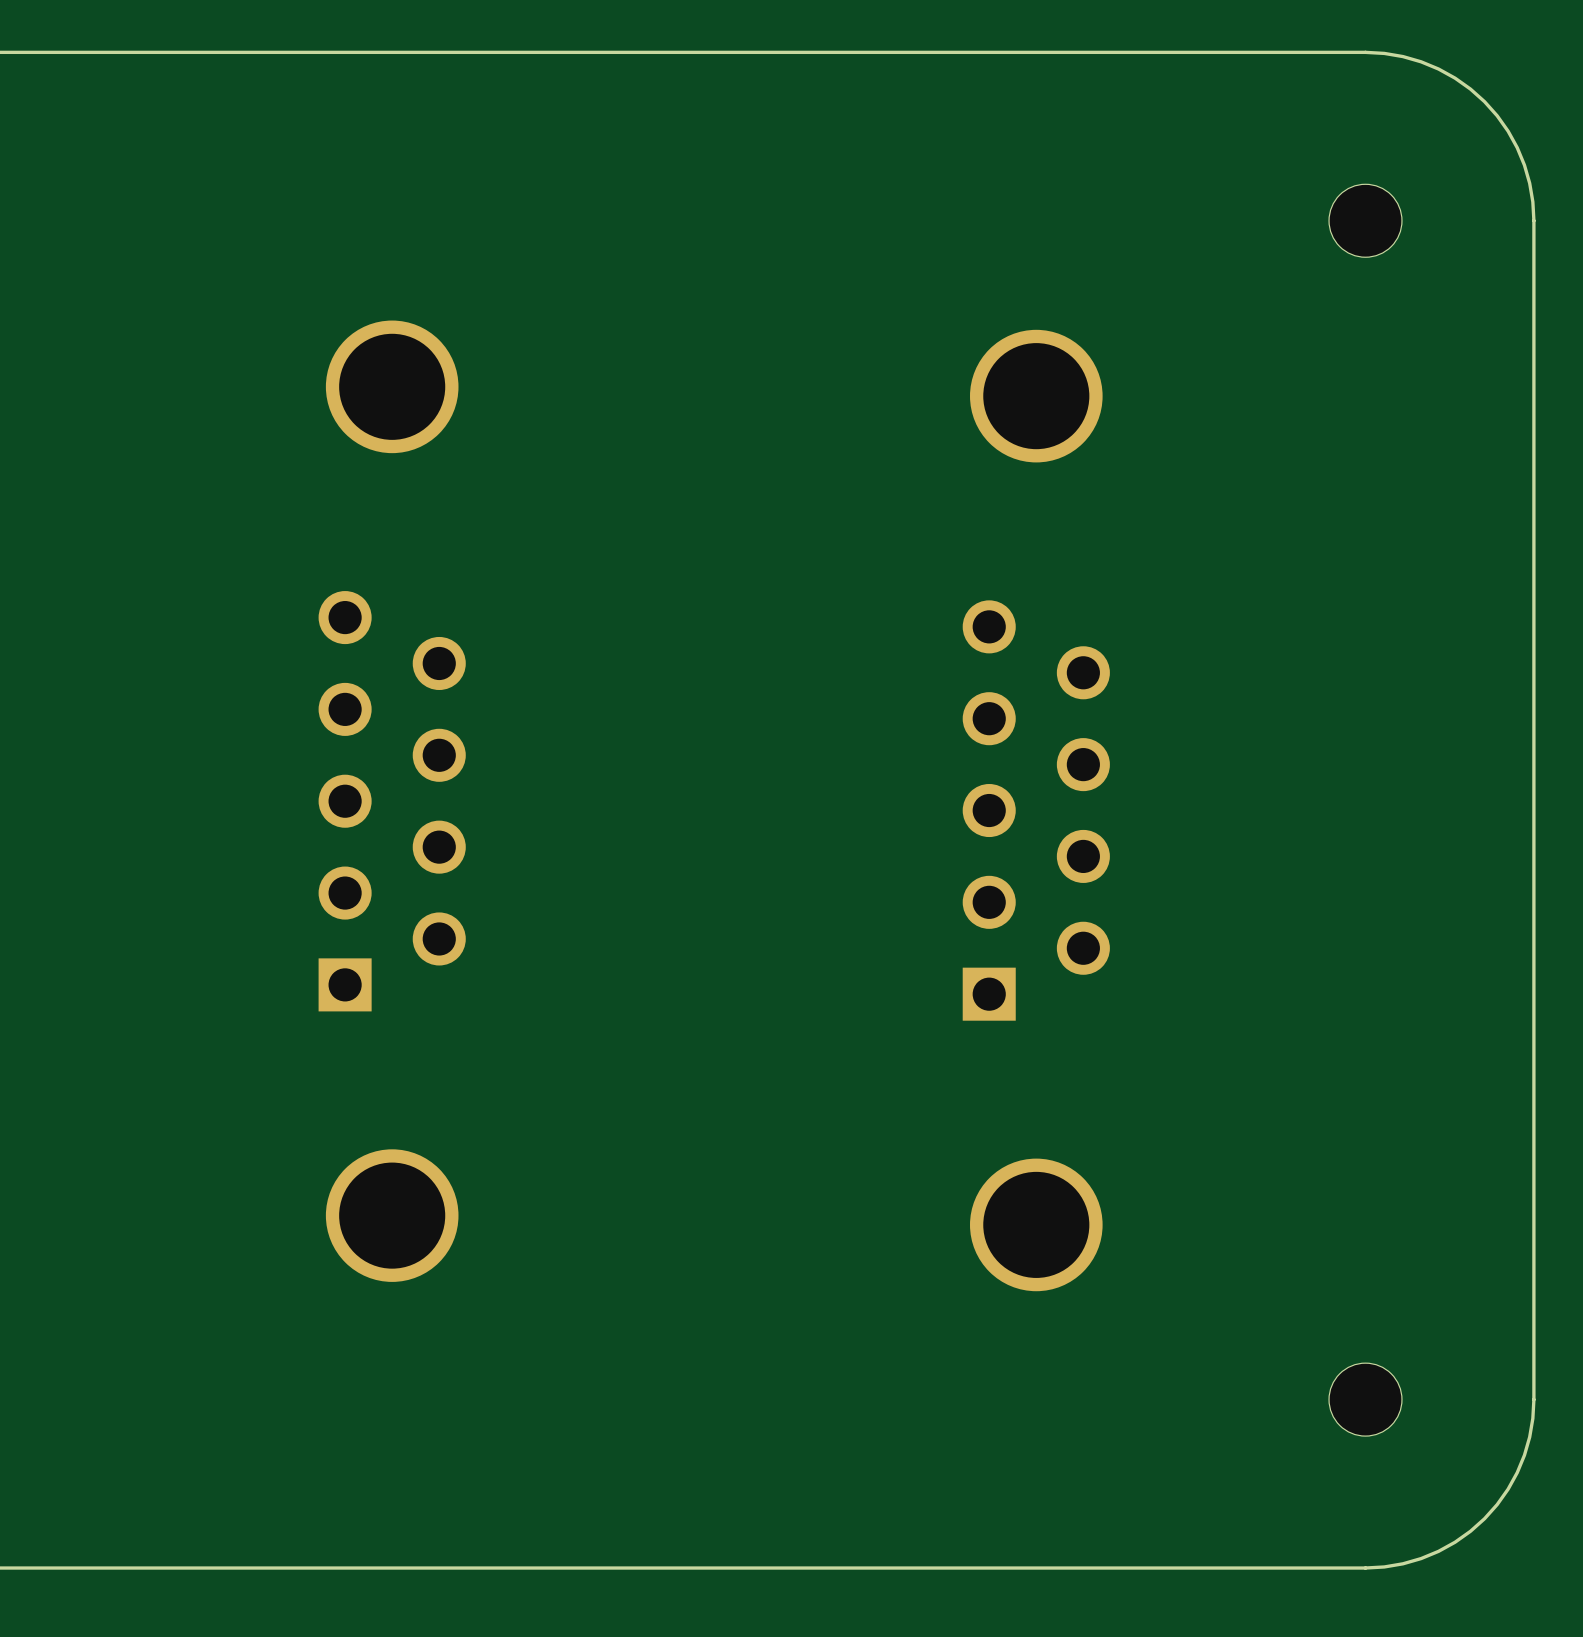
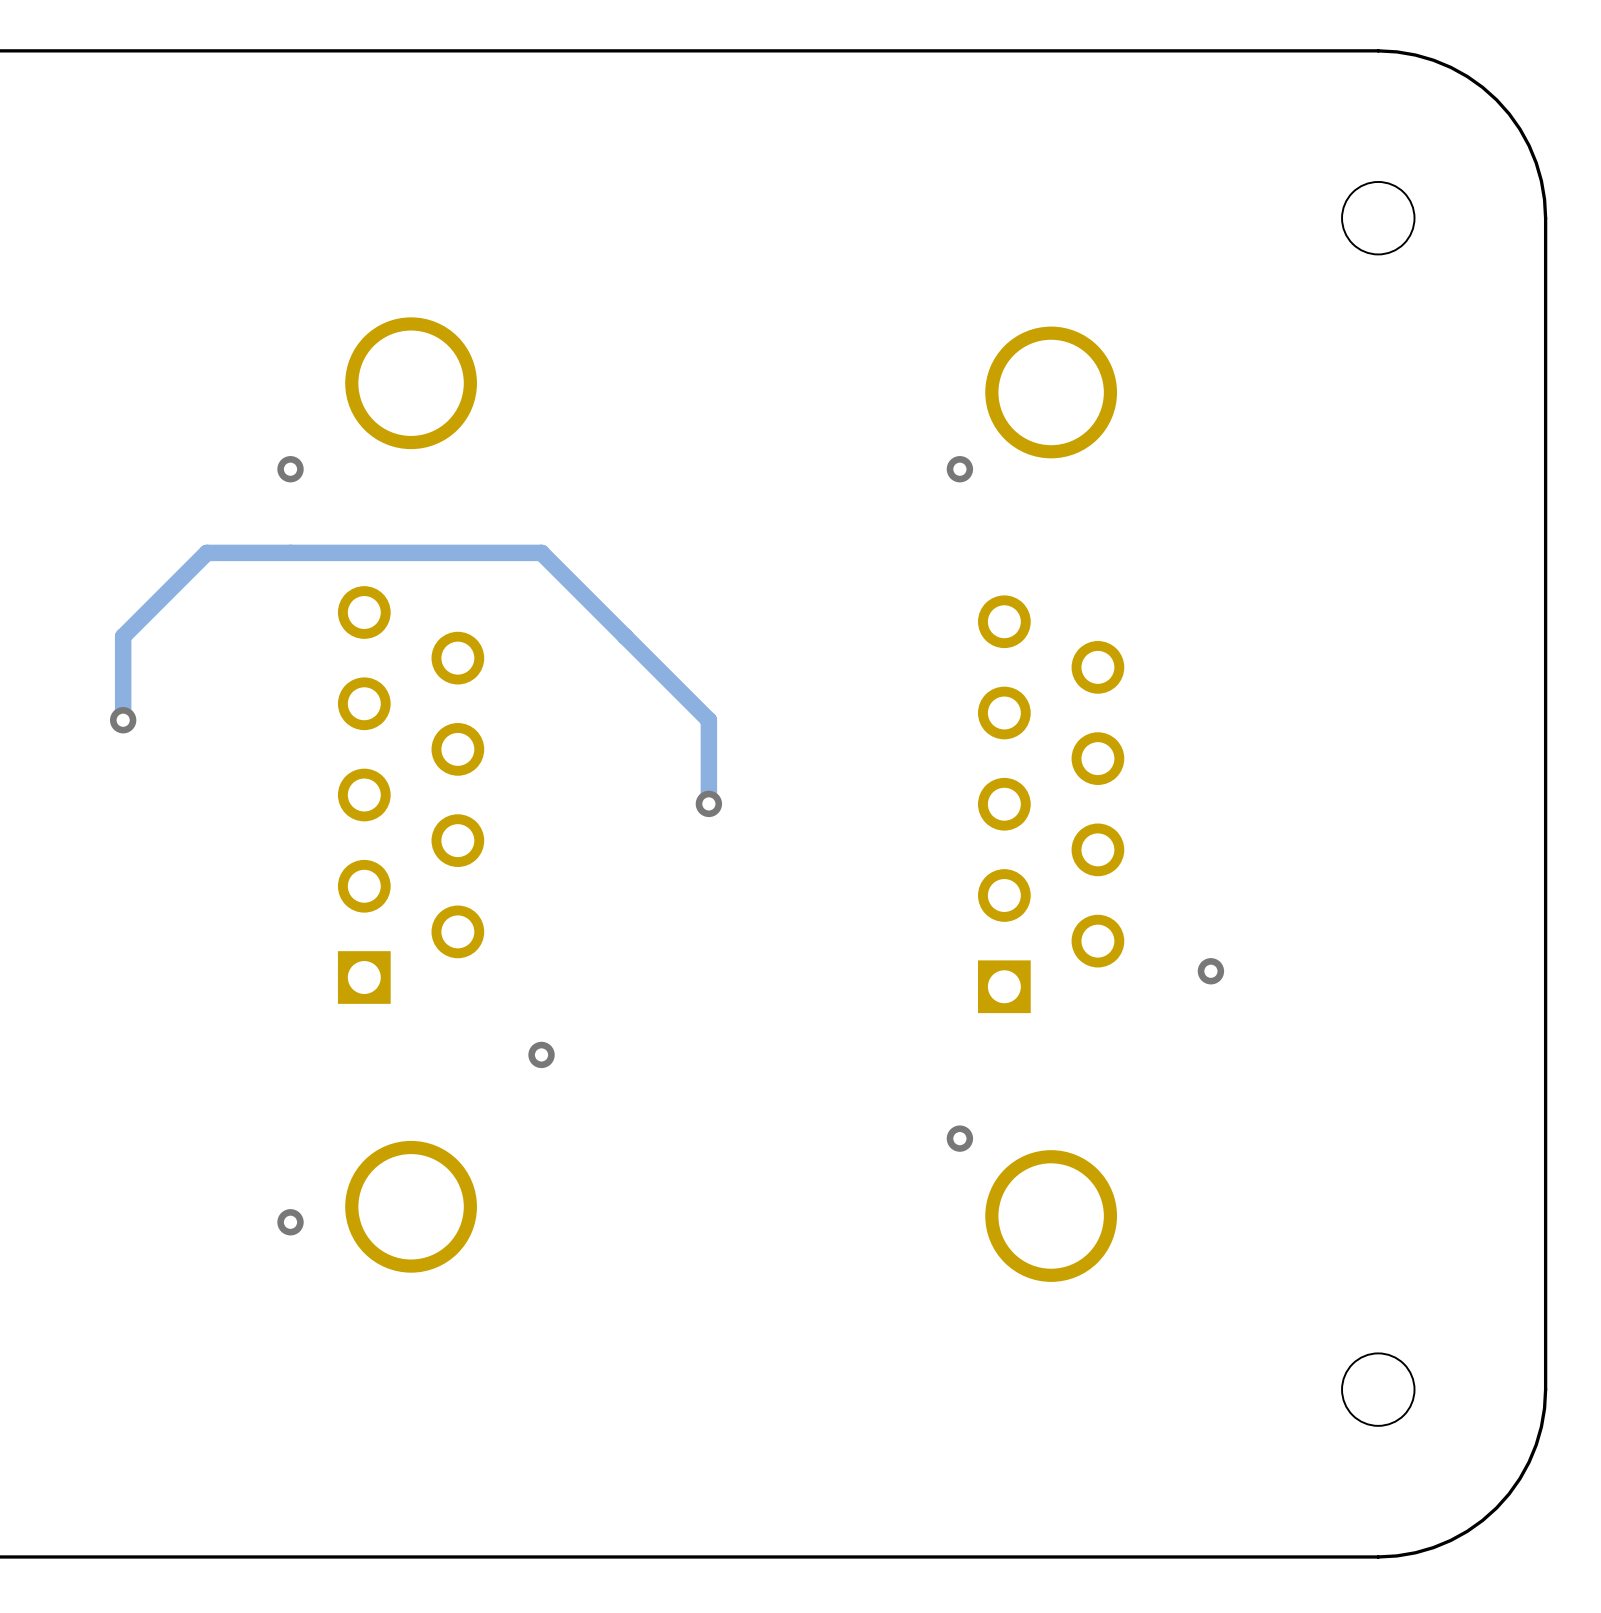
via: none -> (290, 469)
via: none -> (959, 469)
track: none -> (123, 720) (123, 636) (206, 552) (541, 552) (708, 720) (708, 803)
via: none -> (123, 720)
via: none -> (708, 803)
via: none -> (1210, 971)
via: none -> (541, 1054)
via: none -> (959, 1138)
via: none -> (290, 1222)

